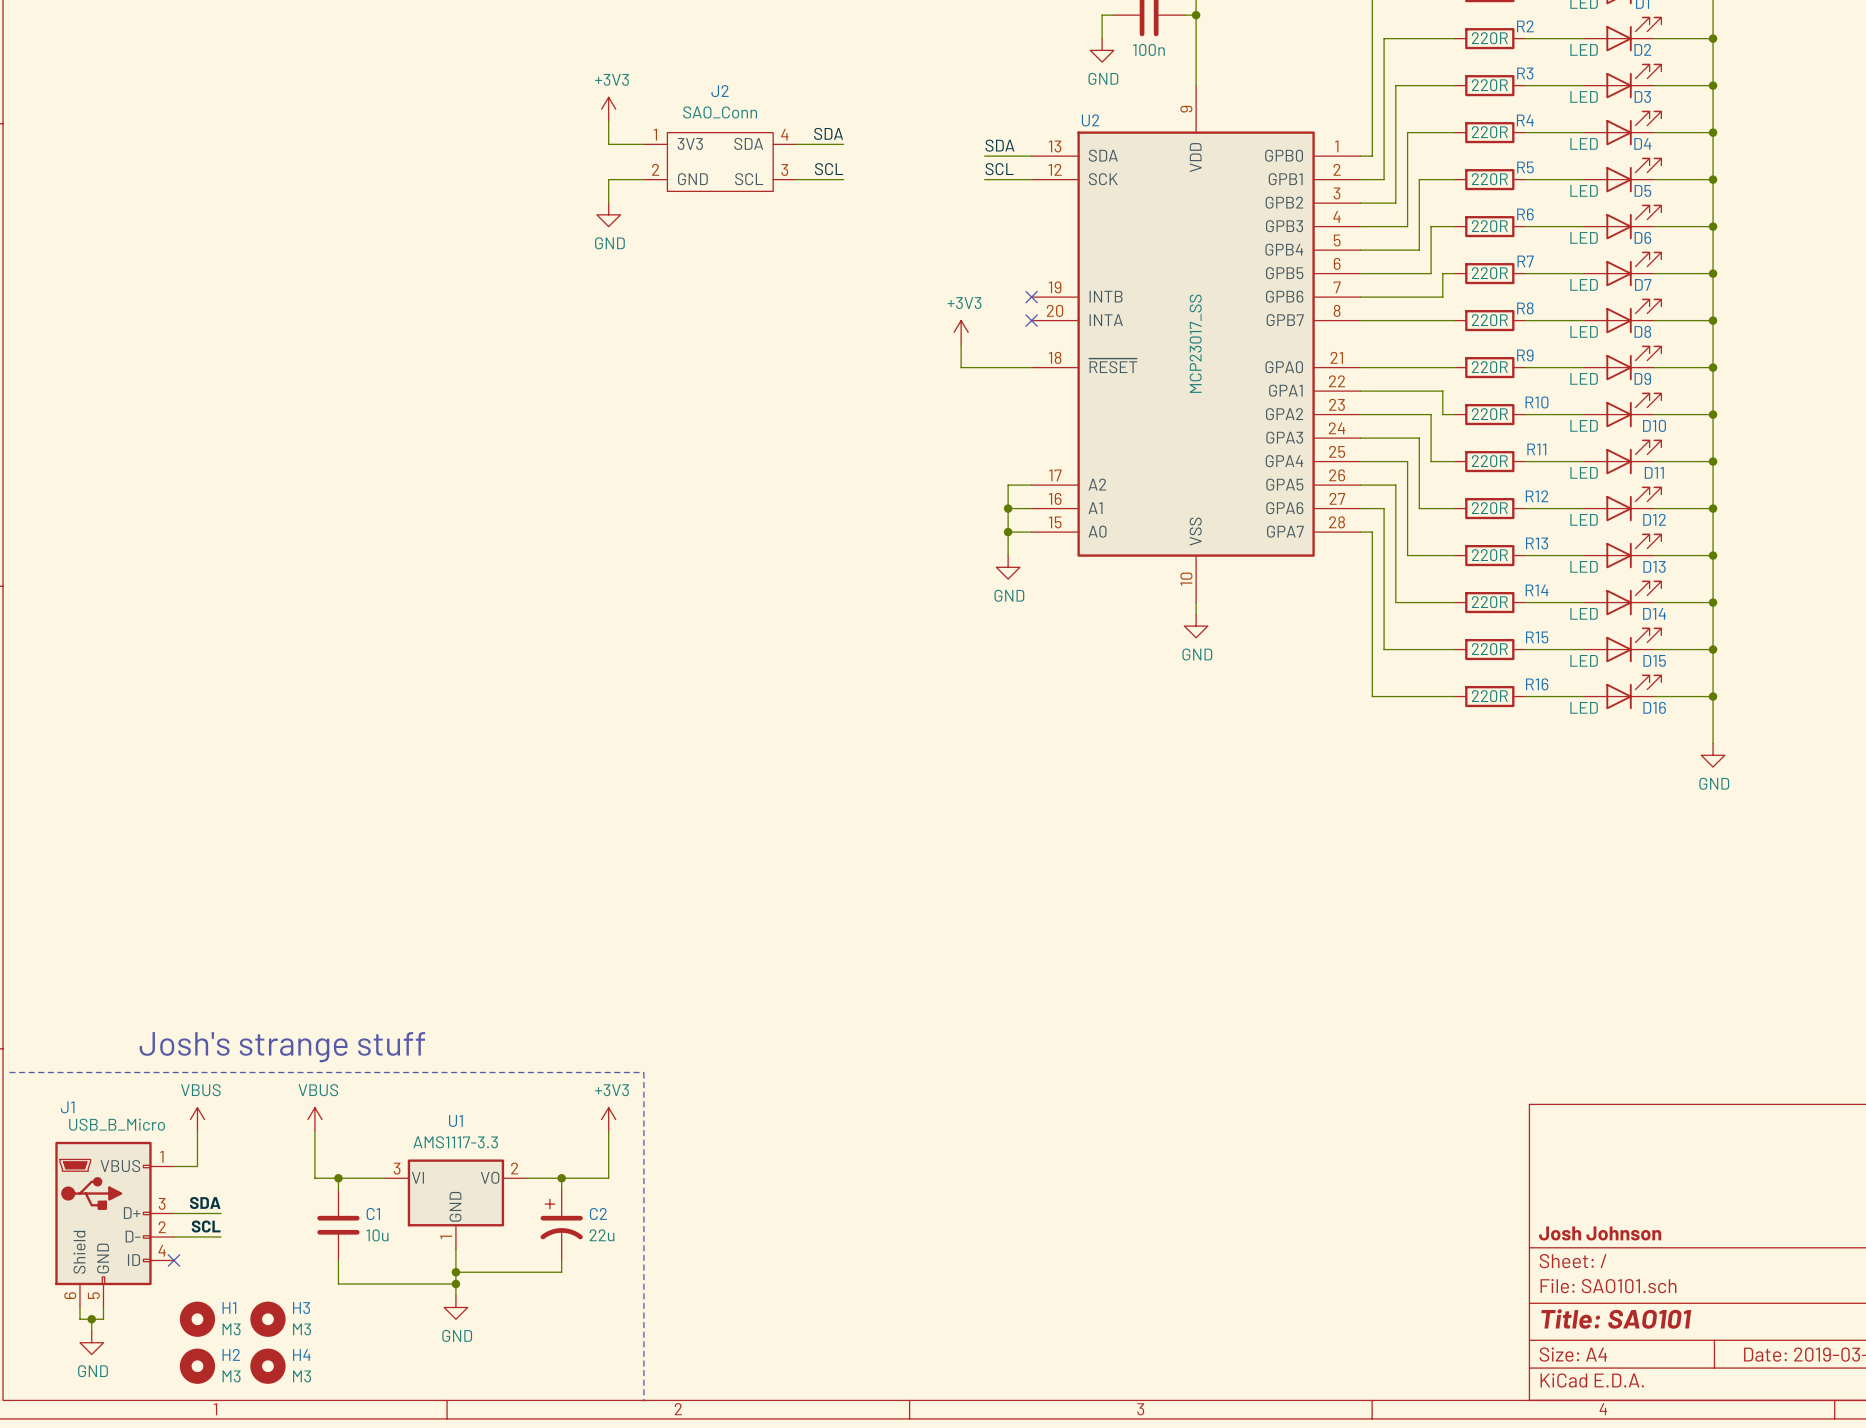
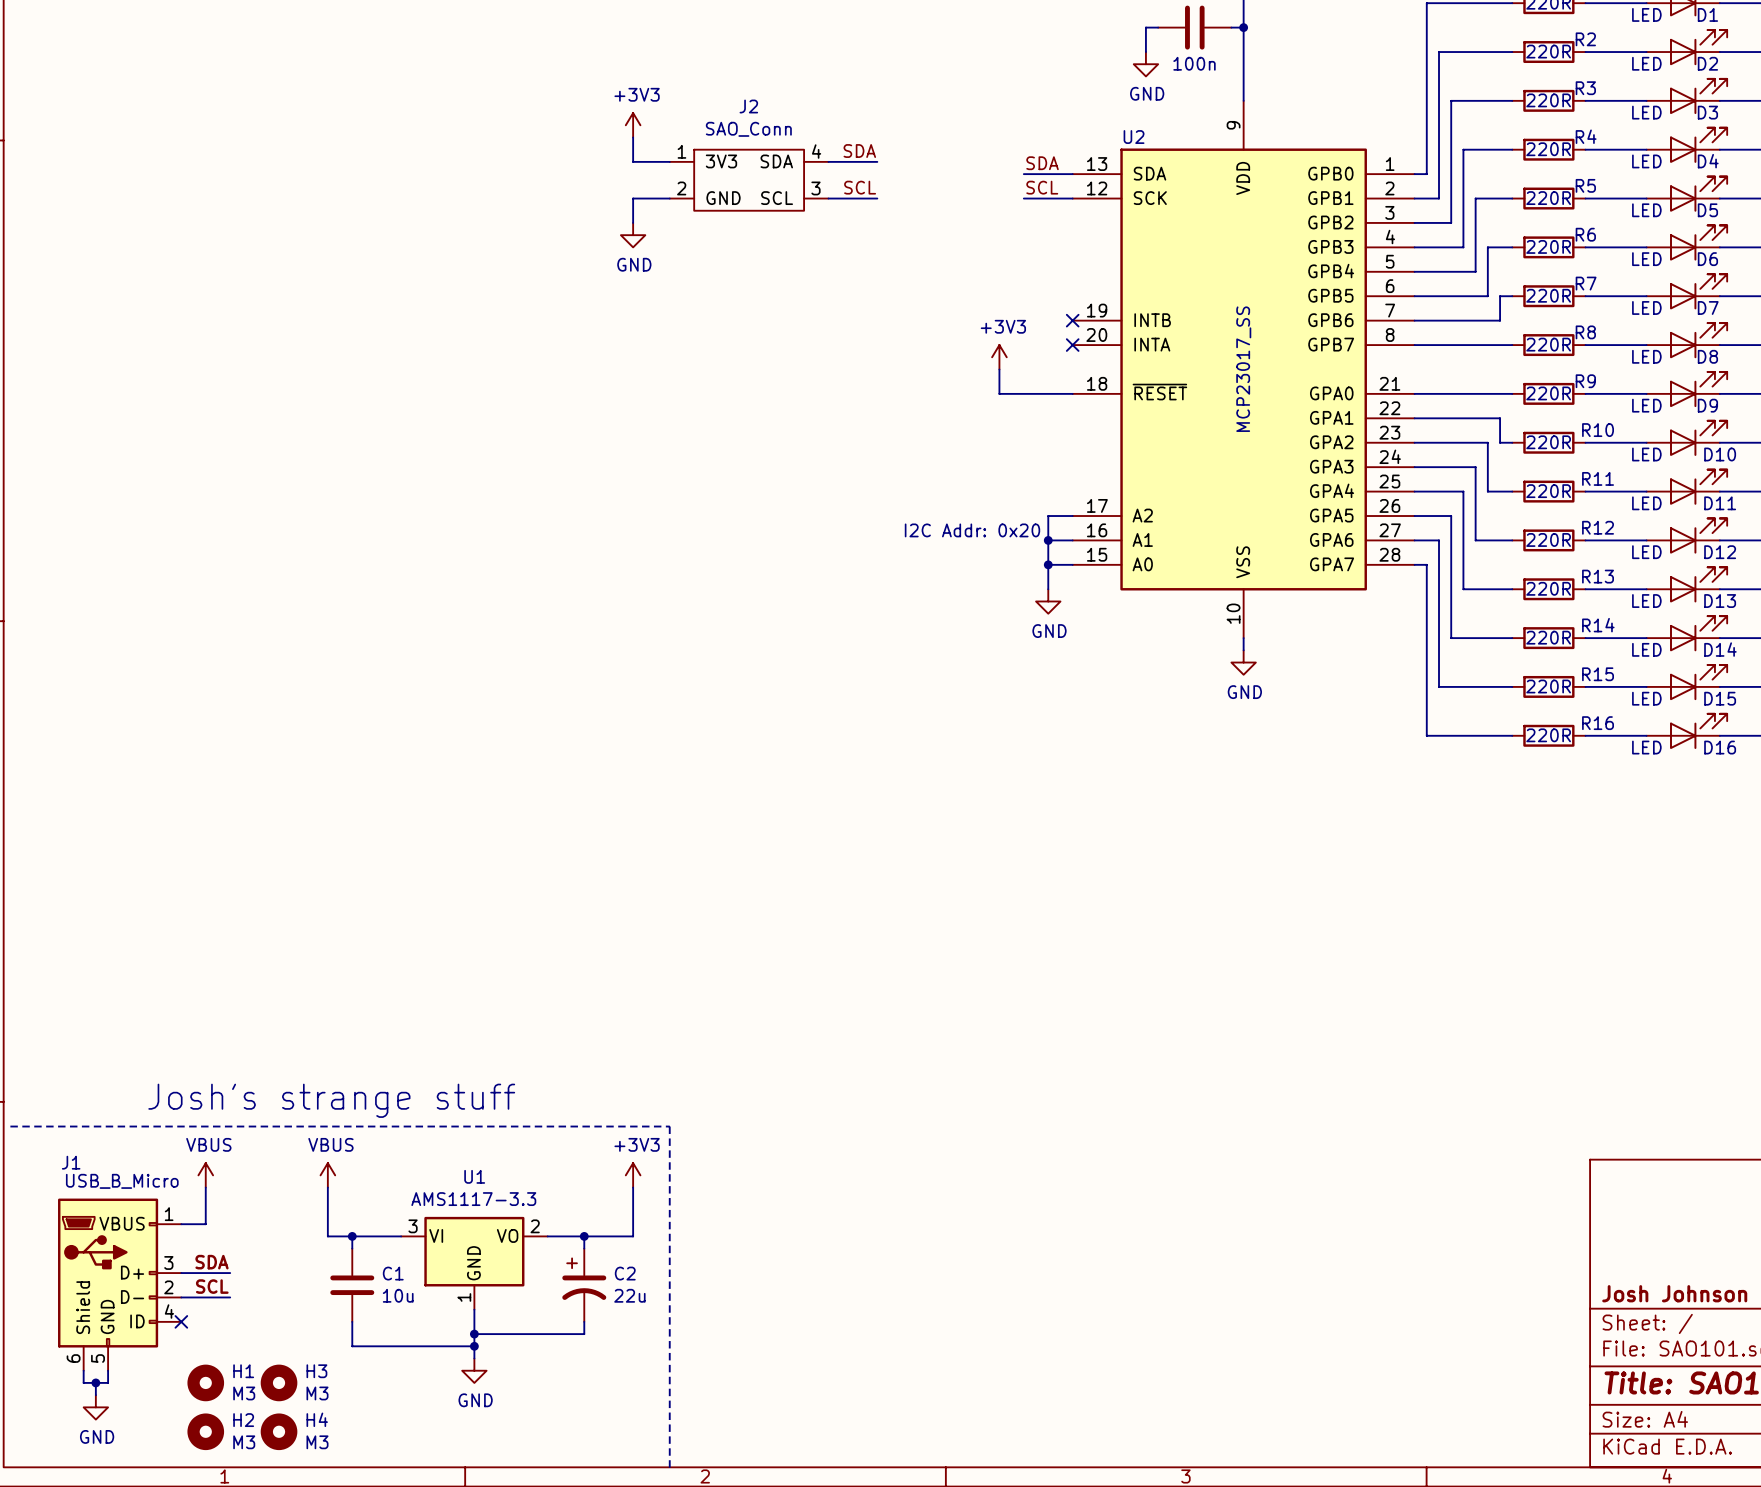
text: none -> I2C Addr: 0x20 (972, 530)

